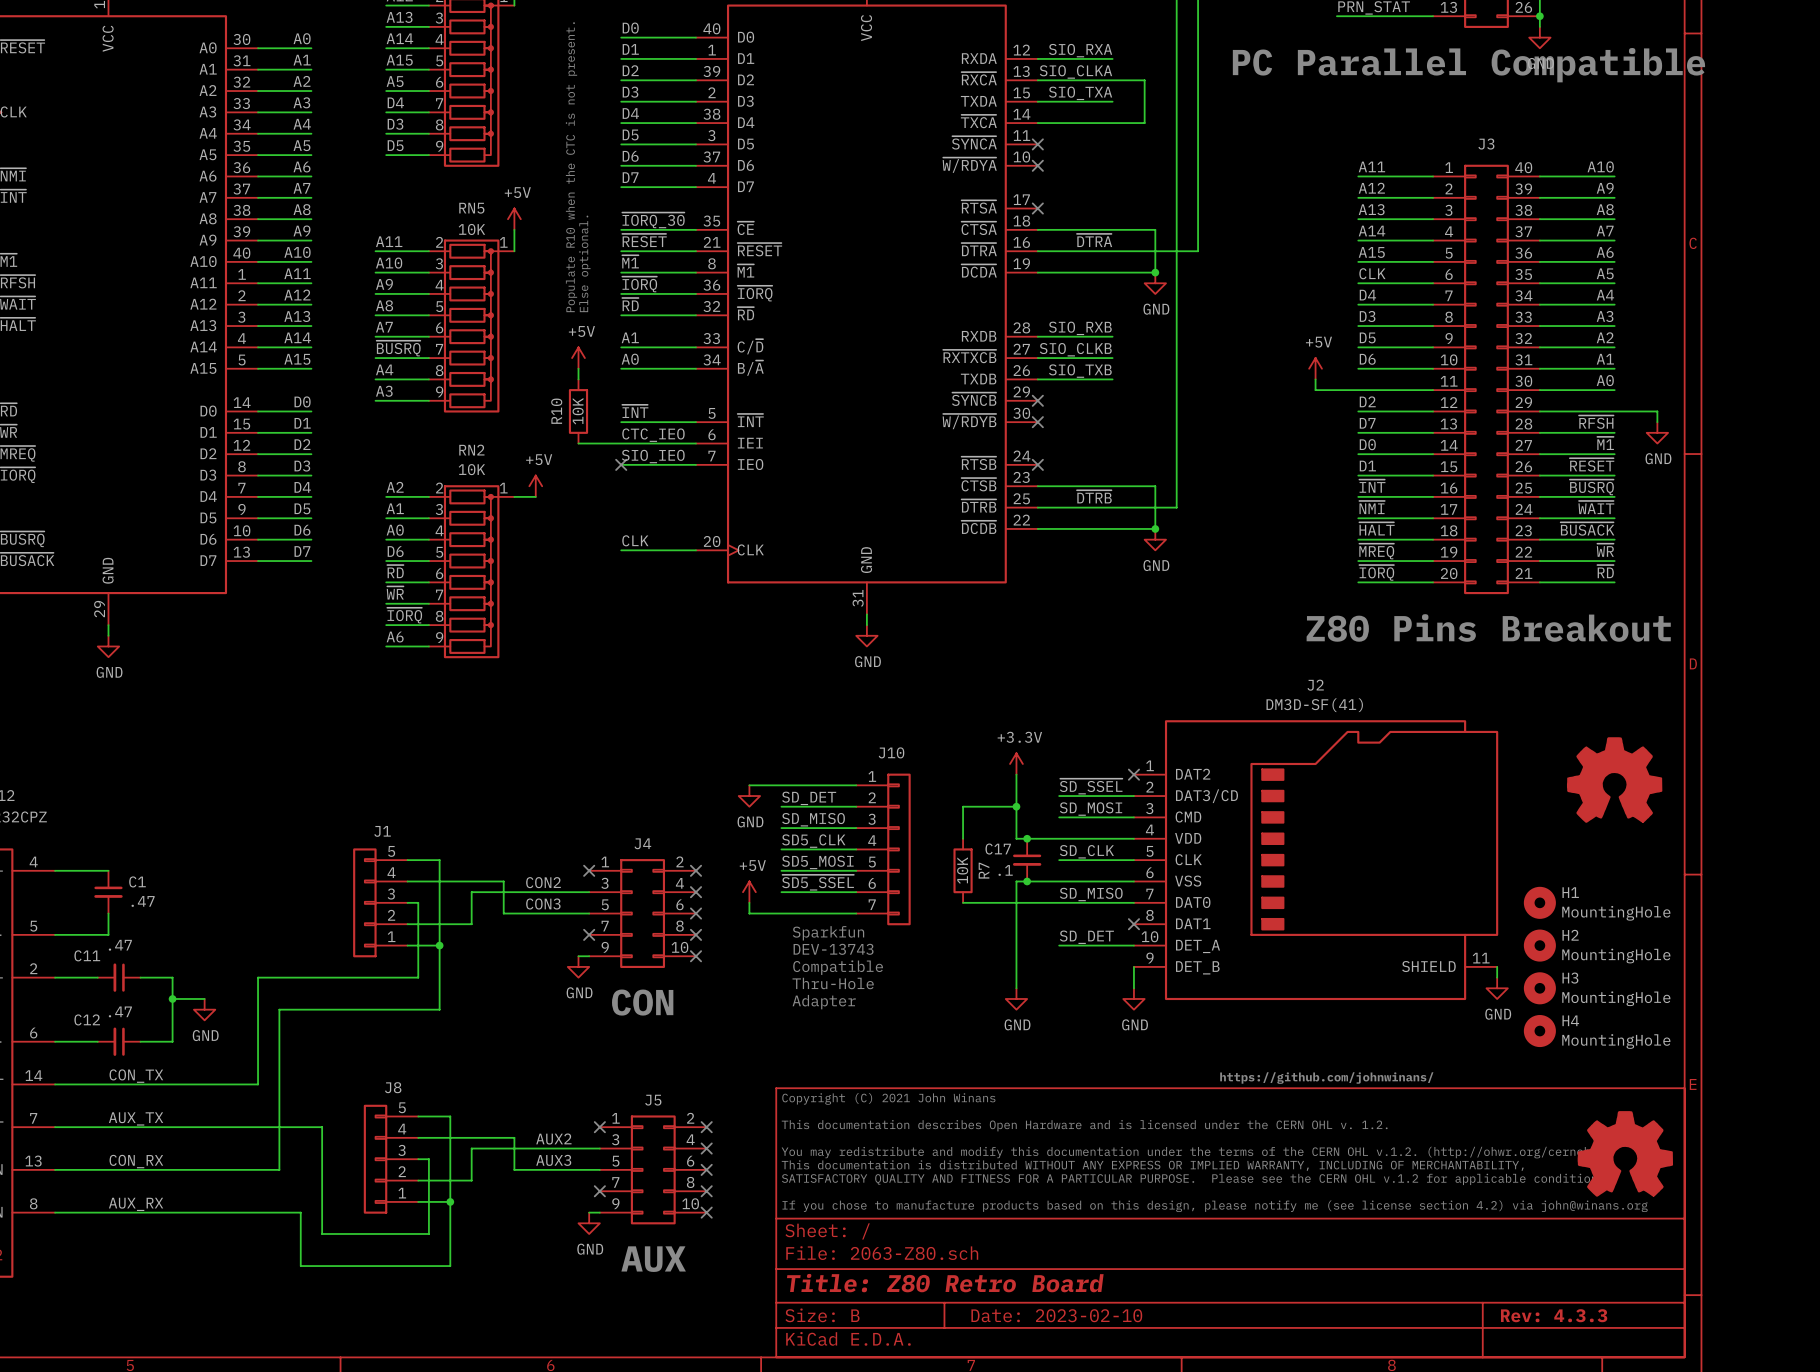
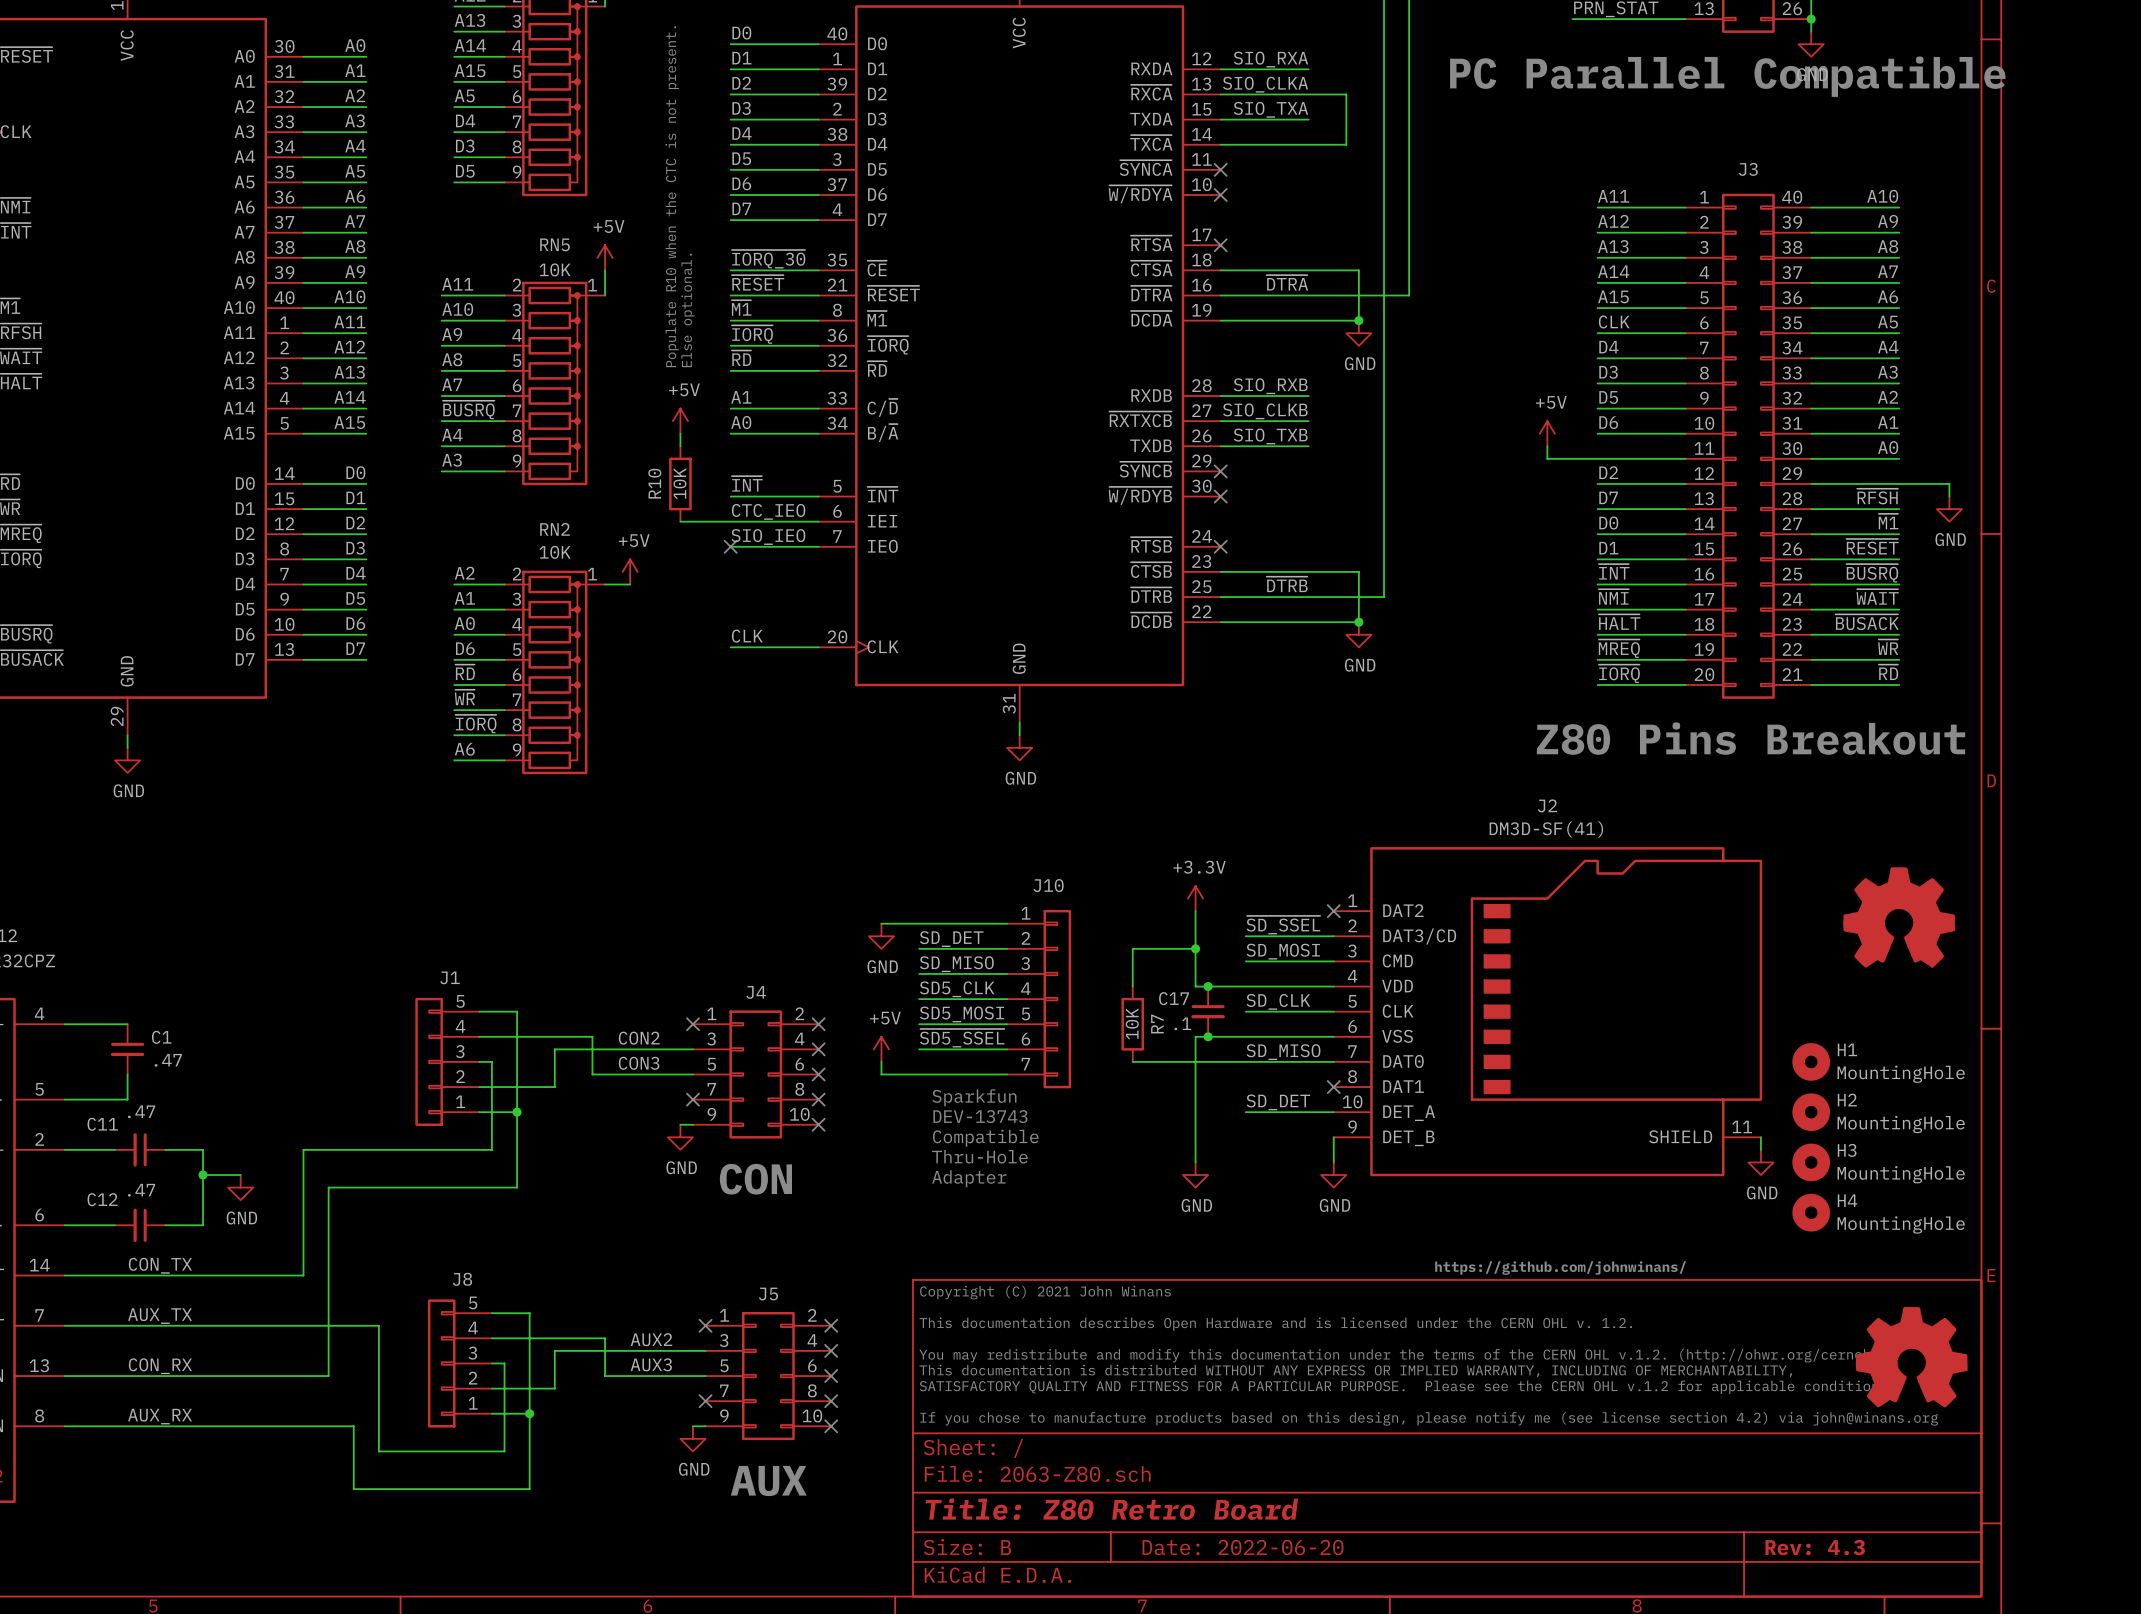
title block: Date: 2023-02-10 (1056, 1315) -> Date: 2022-06-20 (1243, 1547)
title block: Rev: 4.3.3 (1554, 1315) -> Rev: 4.3 (1815, 1547)

